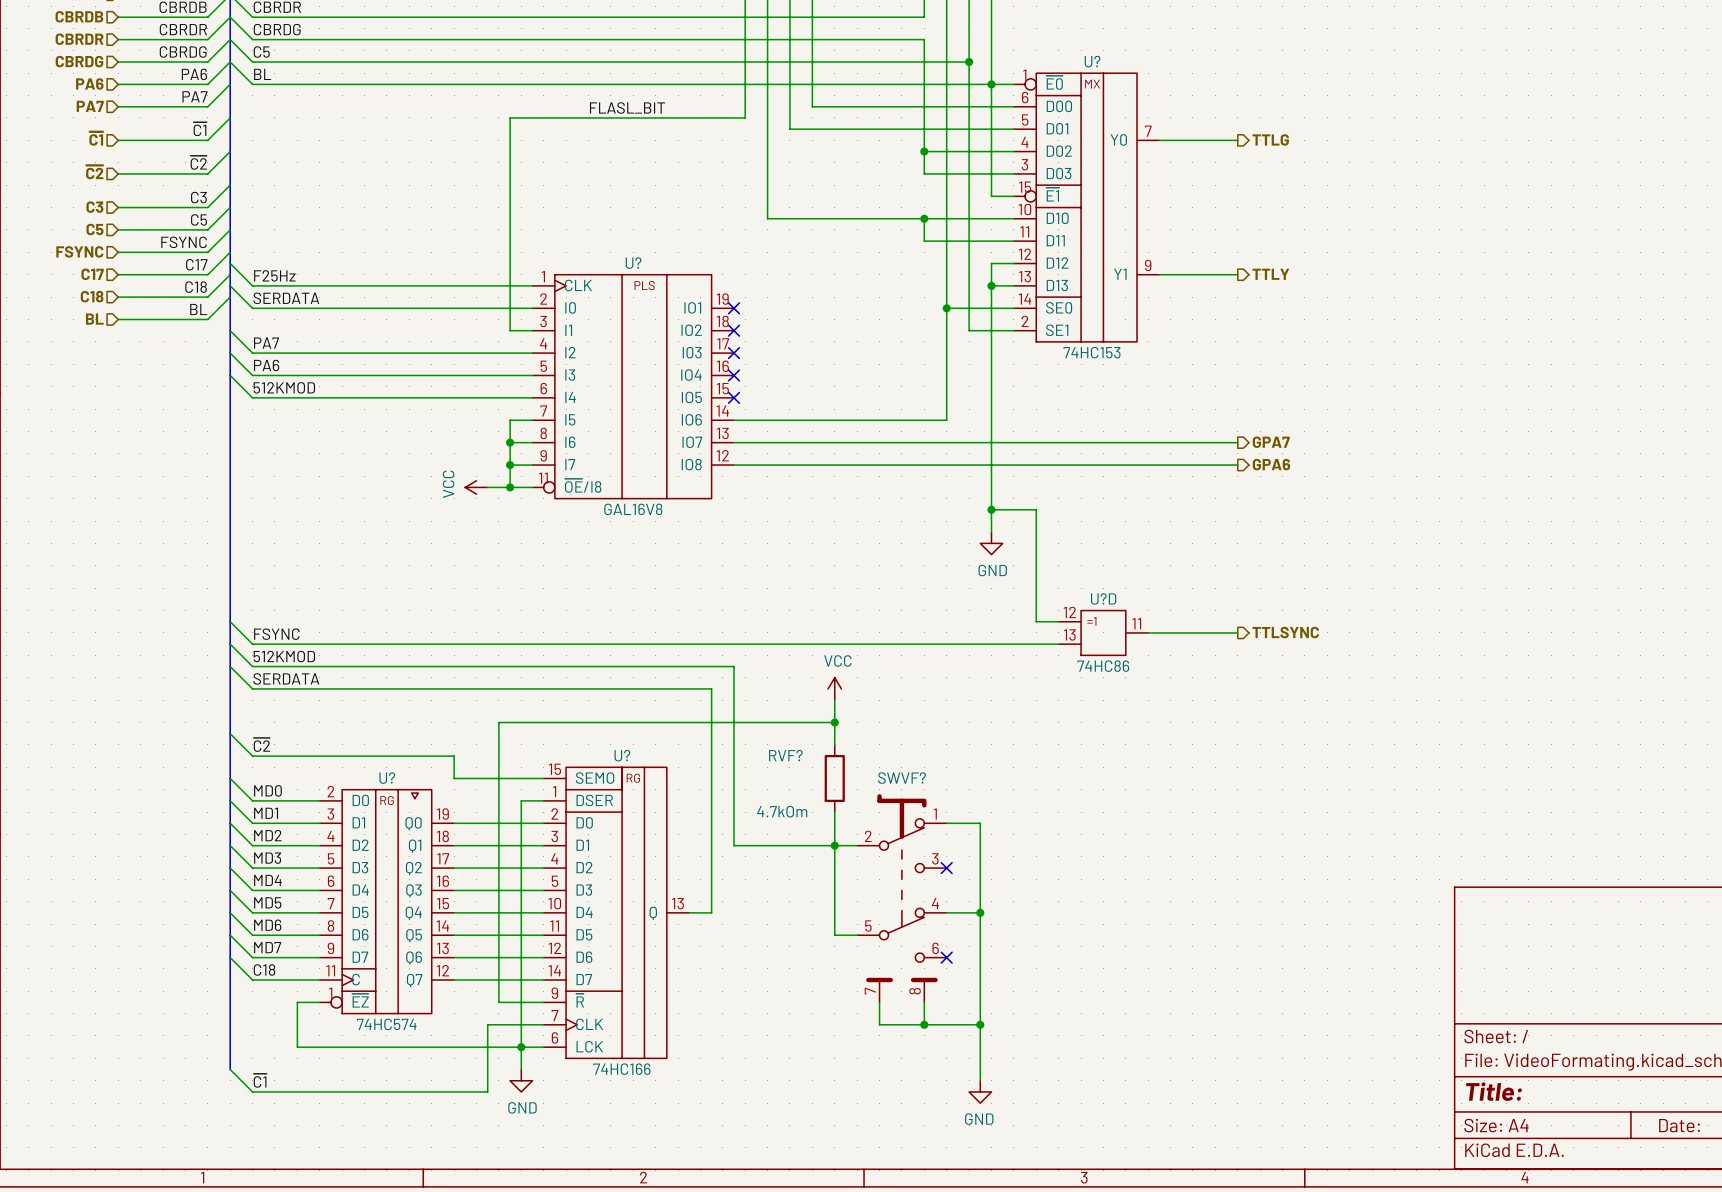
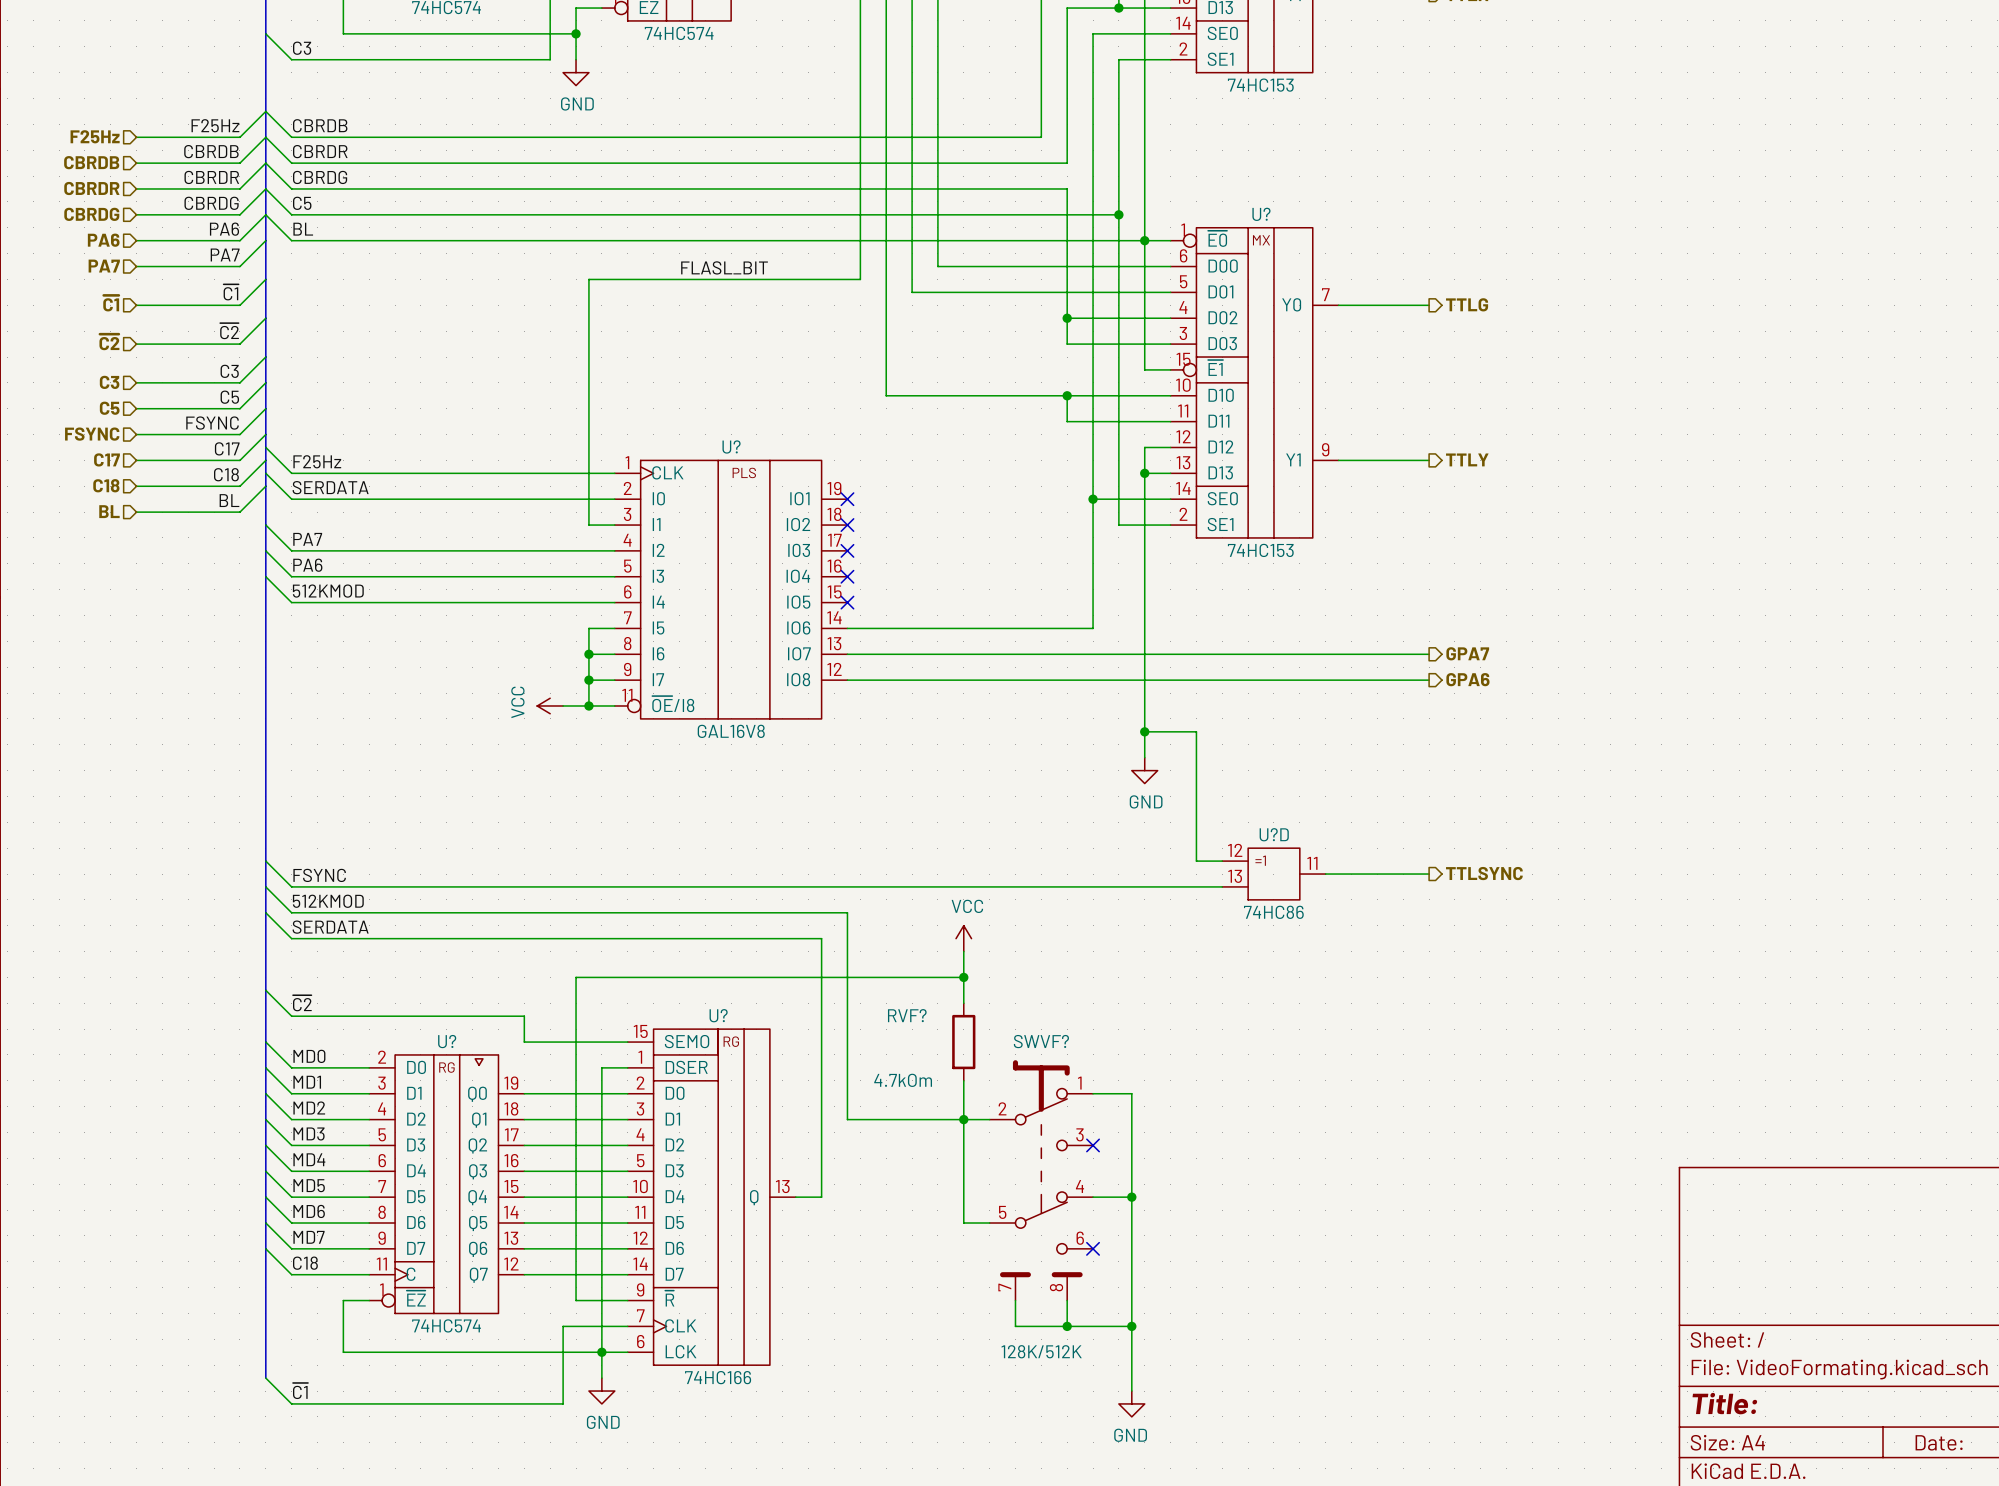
SWVF? value: none -> 128K/512K (1041, 1351)

